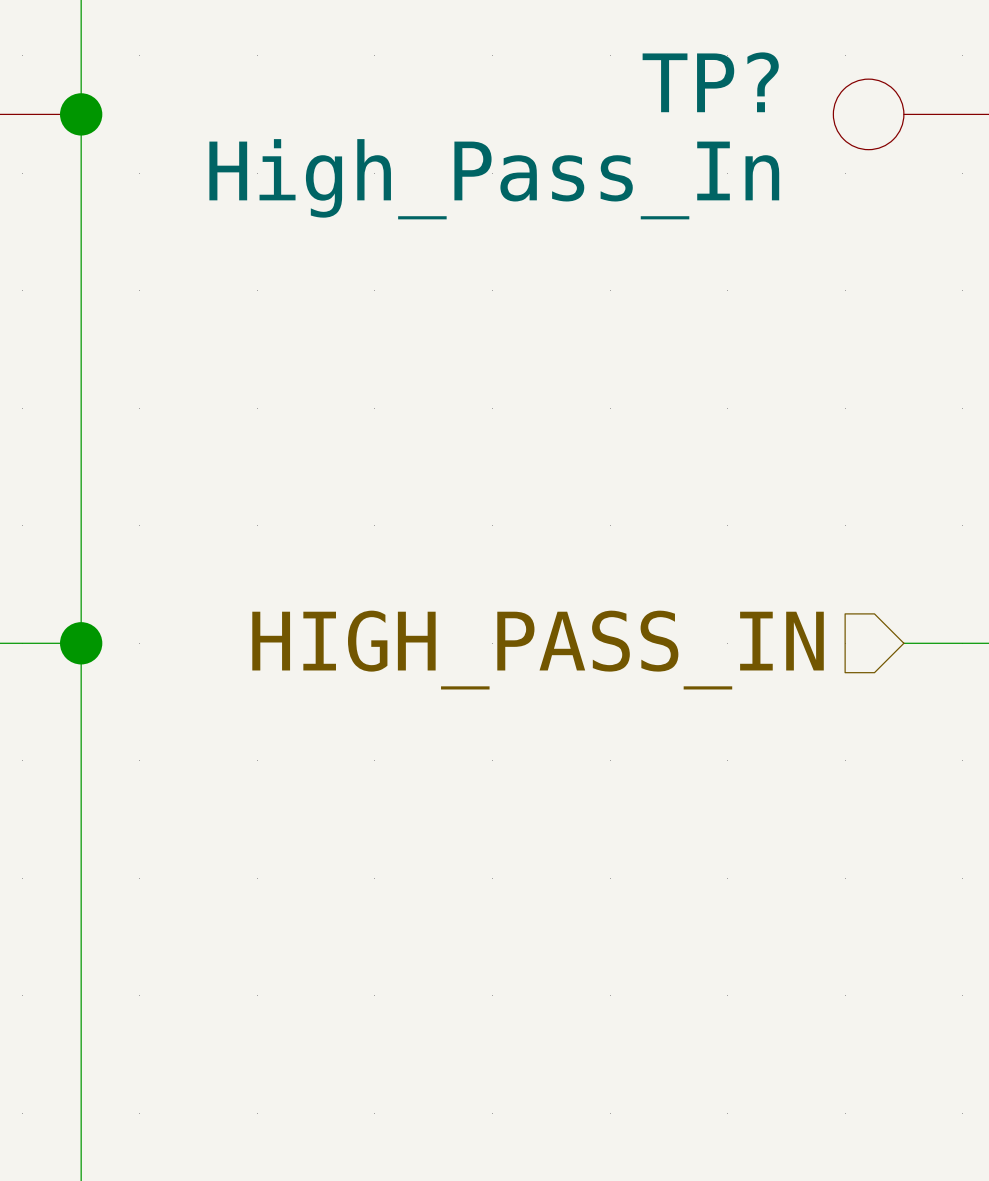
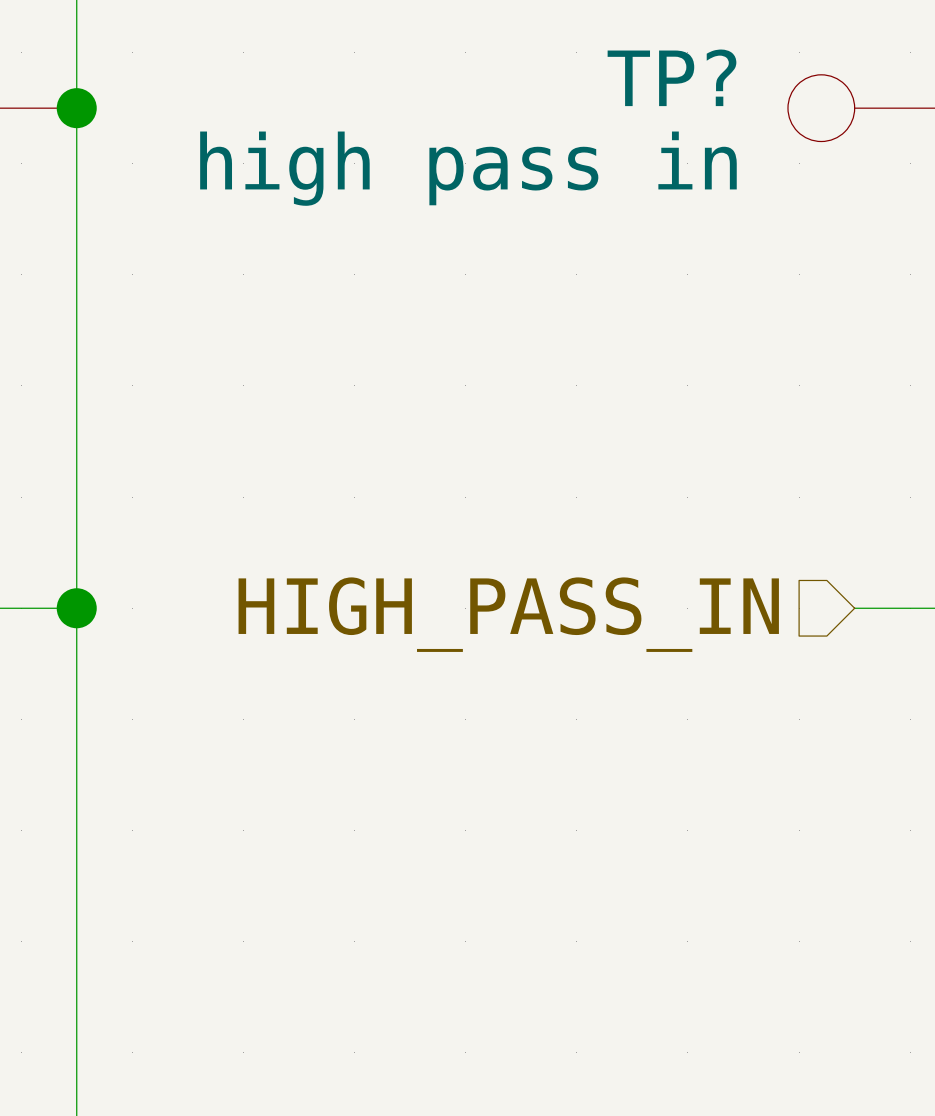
TP? text: High_Pass_In (494, 179) -> high pass in (468, 168)

